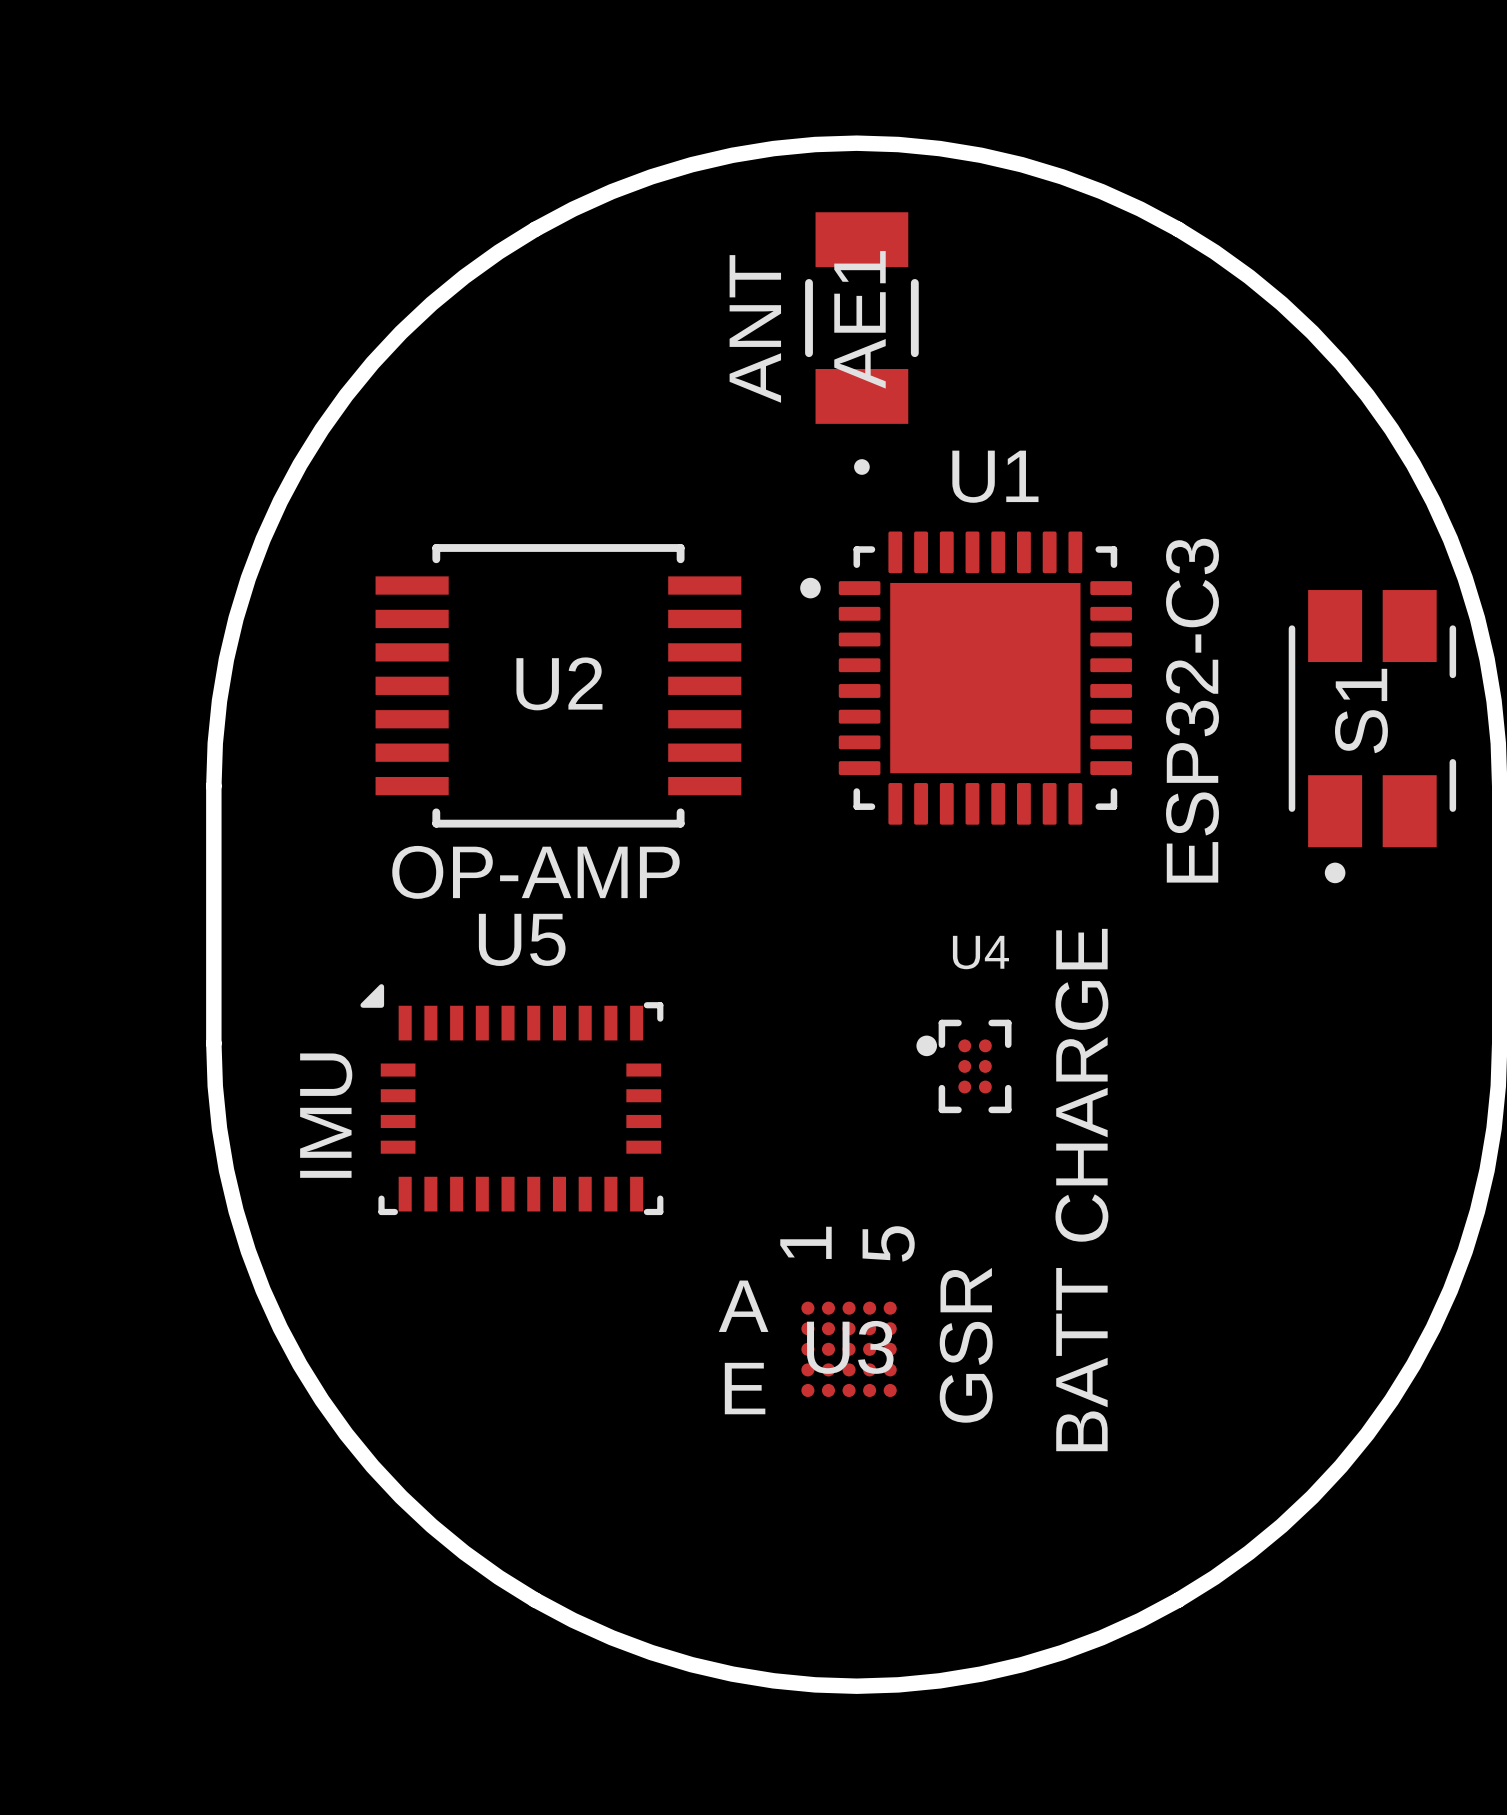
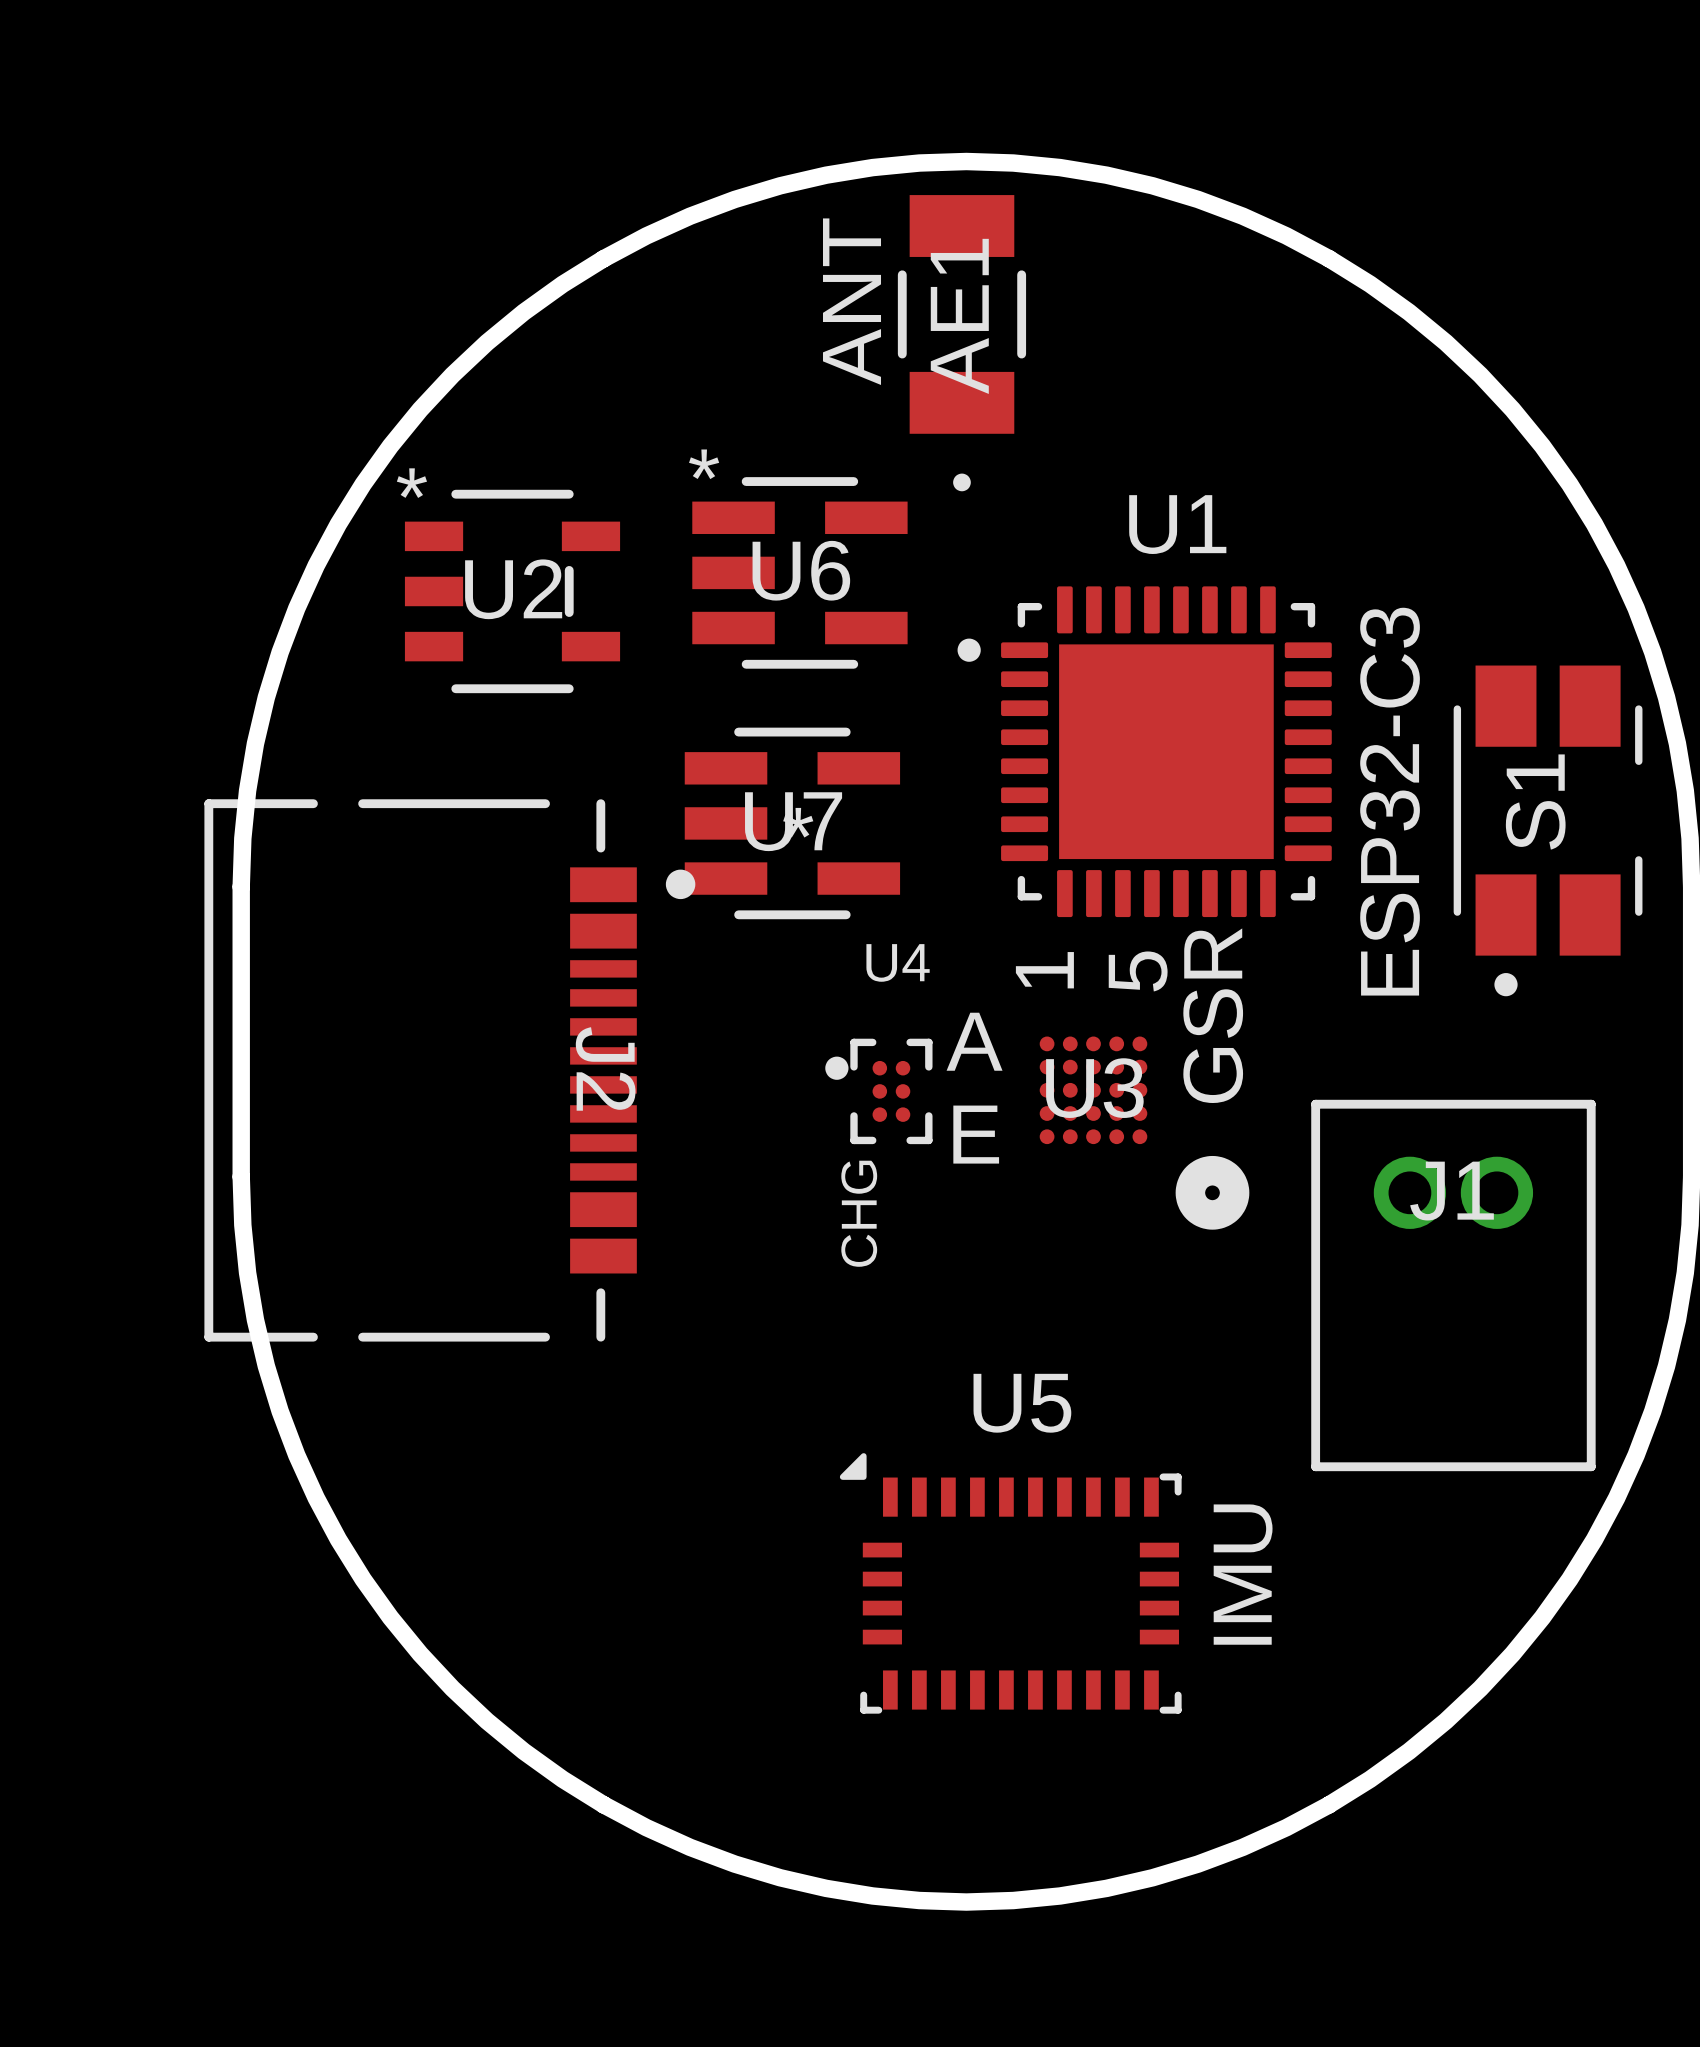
text position: ANT (755, 328) -> ANT (852, 301)
AE1 position: (861, 343) -> (961, 343)
U6: none -> (799, 572)
U2 footprint: [375, 544, 742, 828] -> [404, 489, 621, 694]
U1 position: (966, 678) -> (1144, 751)
text position: ESP32-C3 (1192, 710) -> ESP32-C3 (1390, 801)
U7: none -> (792, 823)
text: OP-AMP (535, 872) -> none
J2: none -> (449, 1070)
U4 position: (963, 1066) -> (878, 1091)
text: none -> CHG (859, 1213)
U5 position: (511, 1099) -> (1010, 1583)
text position: IMU (326, 1115) -> IMU (1243, 1574)
J1: none -> (1385, 1285)
text: BATT CHARGE (1081, 1190) -> none
text position: GSR (966, 1345) -> GSR (1213, 1015)
U3 position: (849, 1349) -> (1093, 1090)

